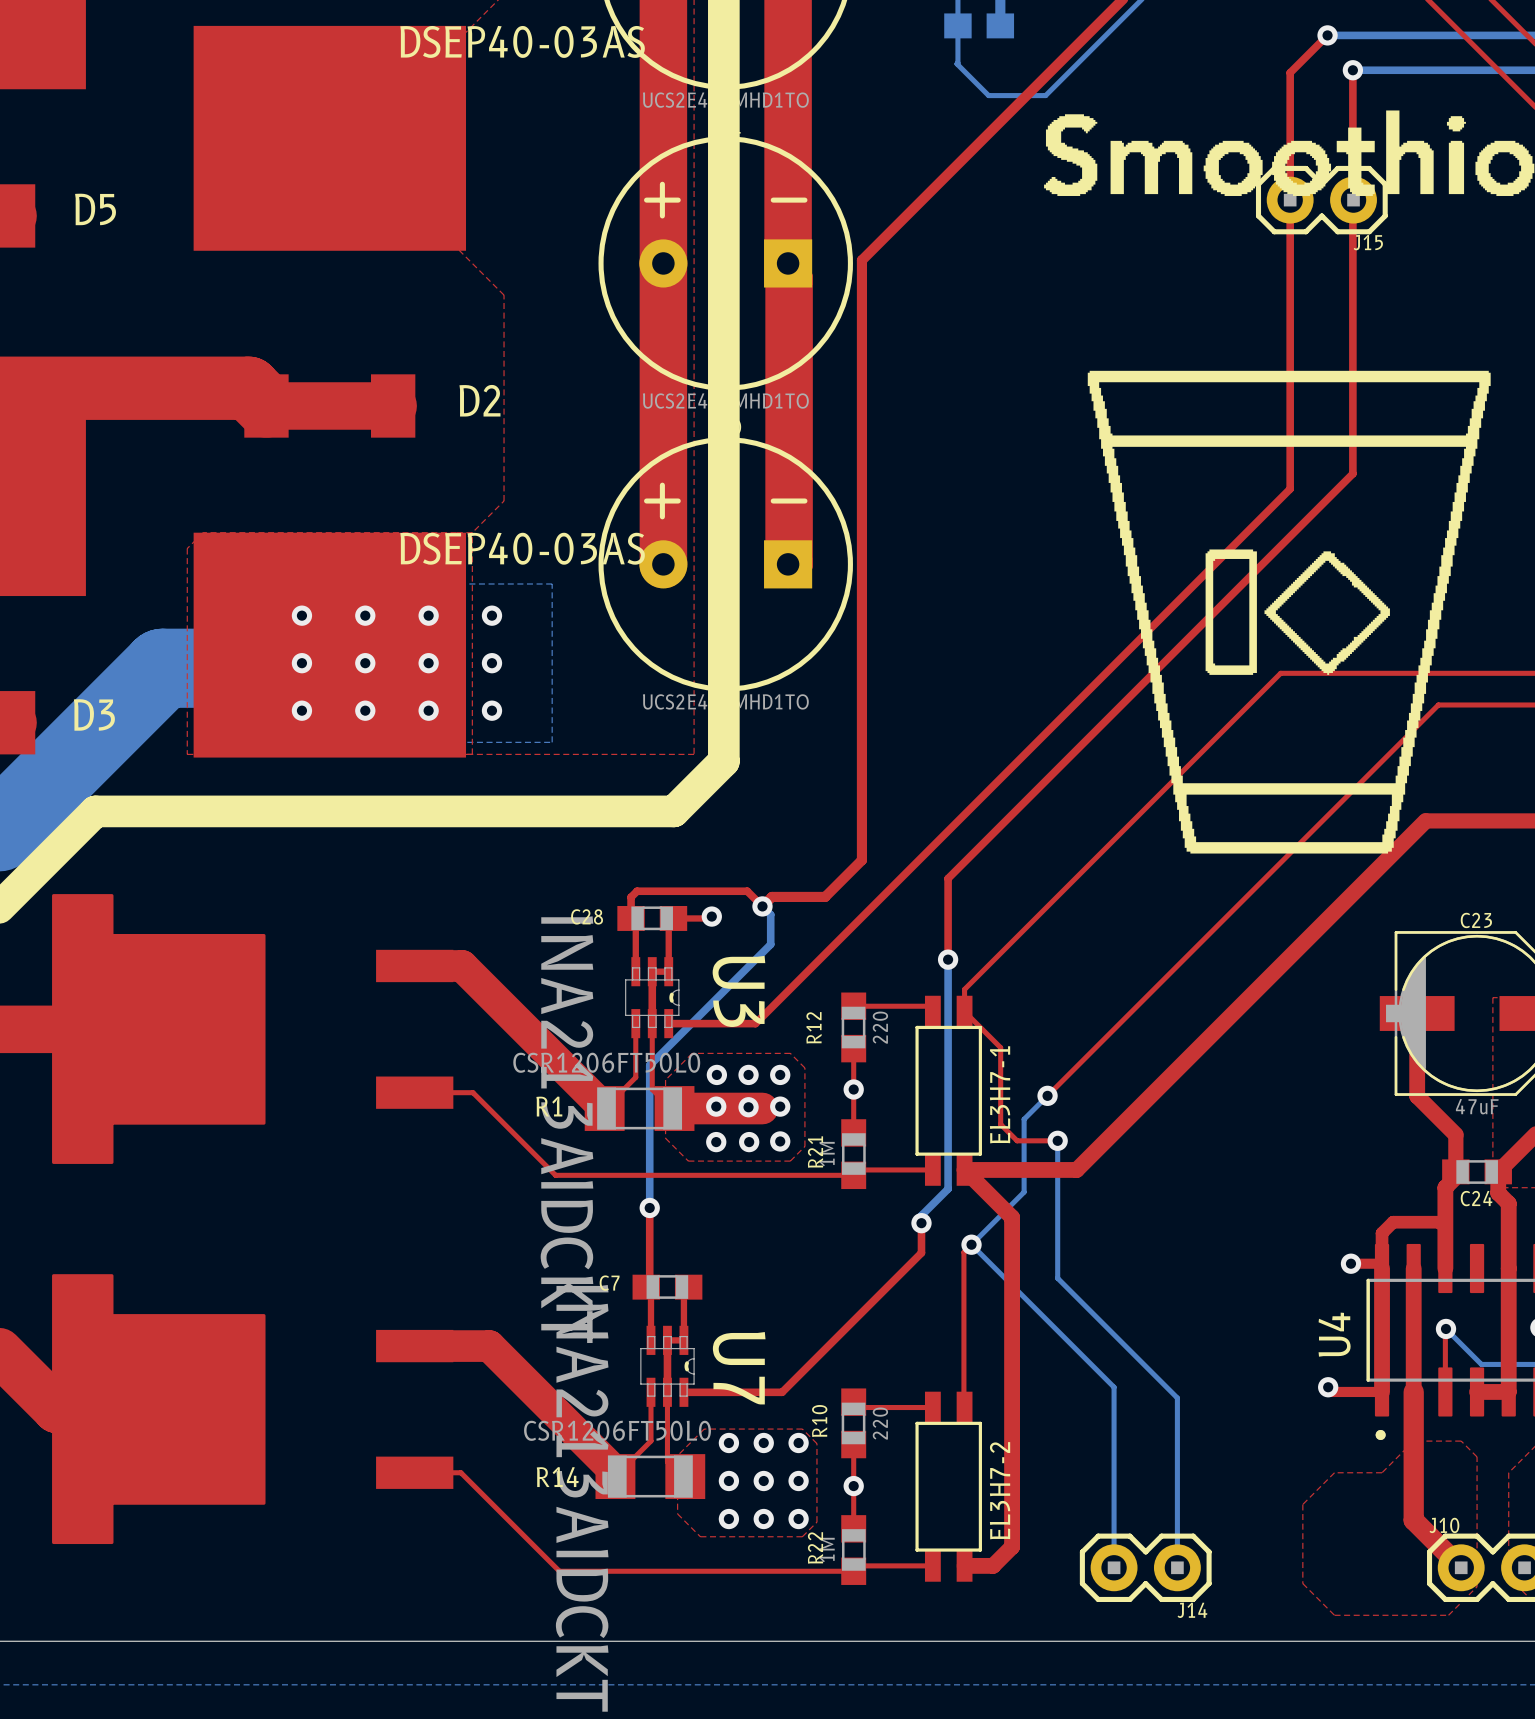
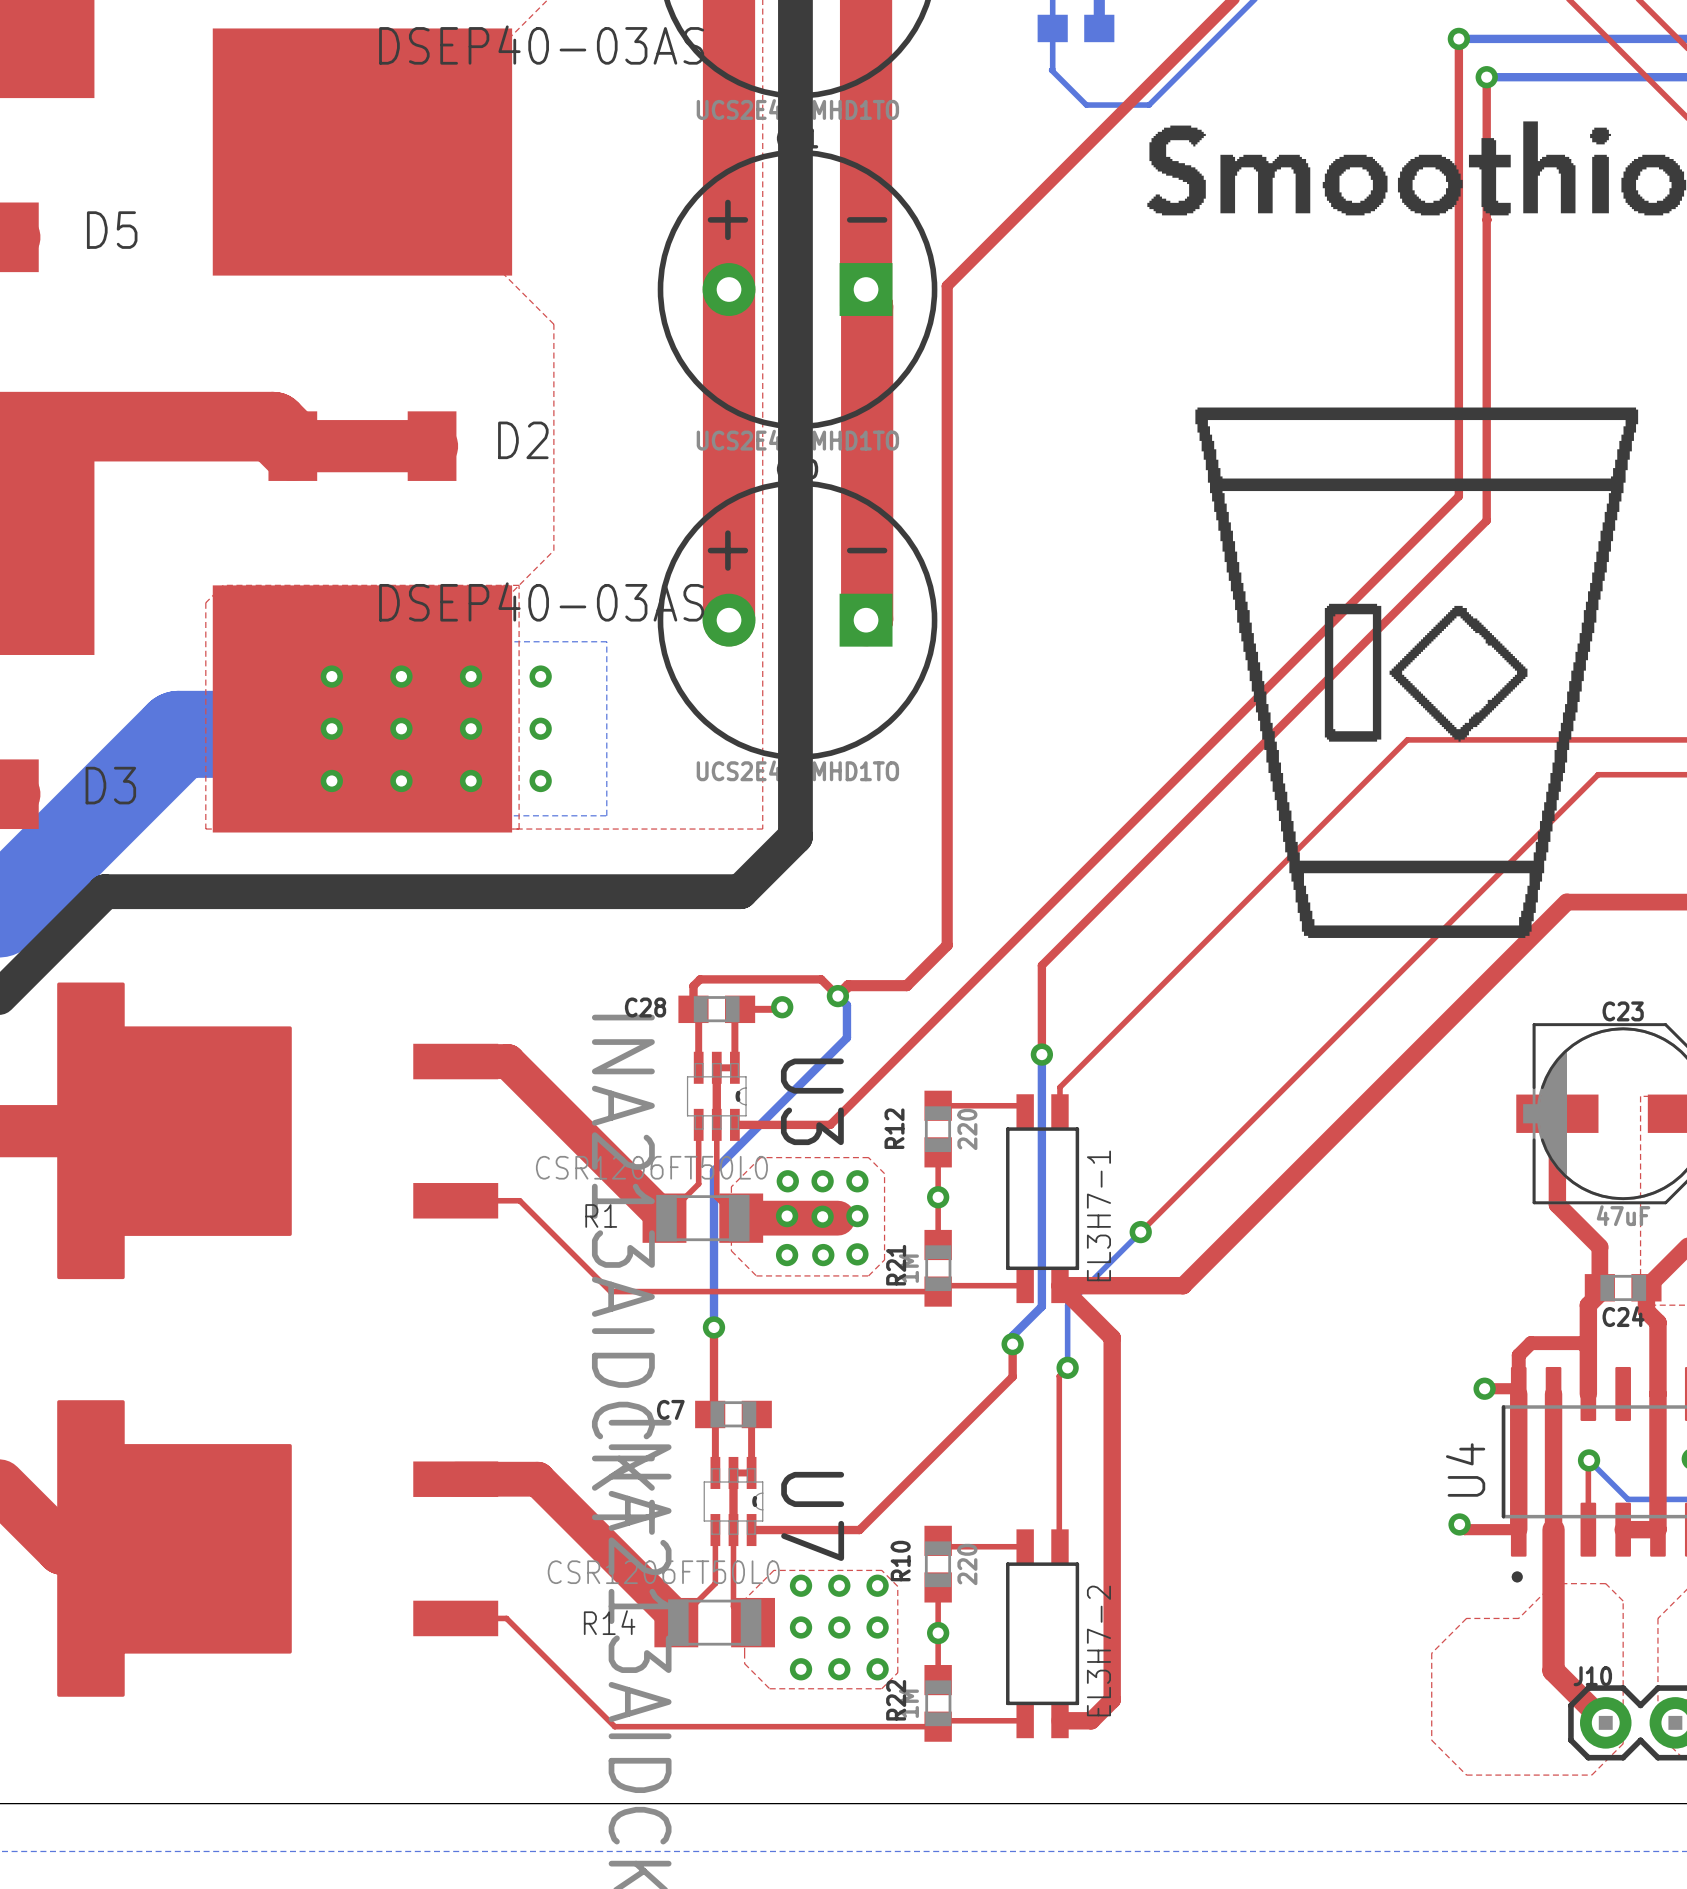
top track: (1327, 35) (1290, 72) (1290, 488) -> (1458, 38) (1458, 496) (1417, 537)
drawing: none -> [1481, 138, 1495, 141]
J15: (1321, 200) -> none
top track: (1454, 704) (1438, 704) (1047, 1095) -> (1598, 774) (1140, 1232)
top track: (964, 1011) (1000, 1047) (1000, 1124) (1017, 1140) (1057, 1140) -> none
bottom track: (1047, 1095) (1024, 1119) (1024, 1192) (971, 1244) (1114, 1387) (1114, 1567) -> none
via: (1047, 1095) -> none
bottom track: none -> (1140, 1232) (1067, 1305) (1067, 1367)
via: none -> (1140, 1232)
bottom track: (1057, 1140) (1057, 1278) (1177, 1398) (1177, 1567) -> none
via: (1057, 1140) -> none
J14: (1145, 1567) -> none

